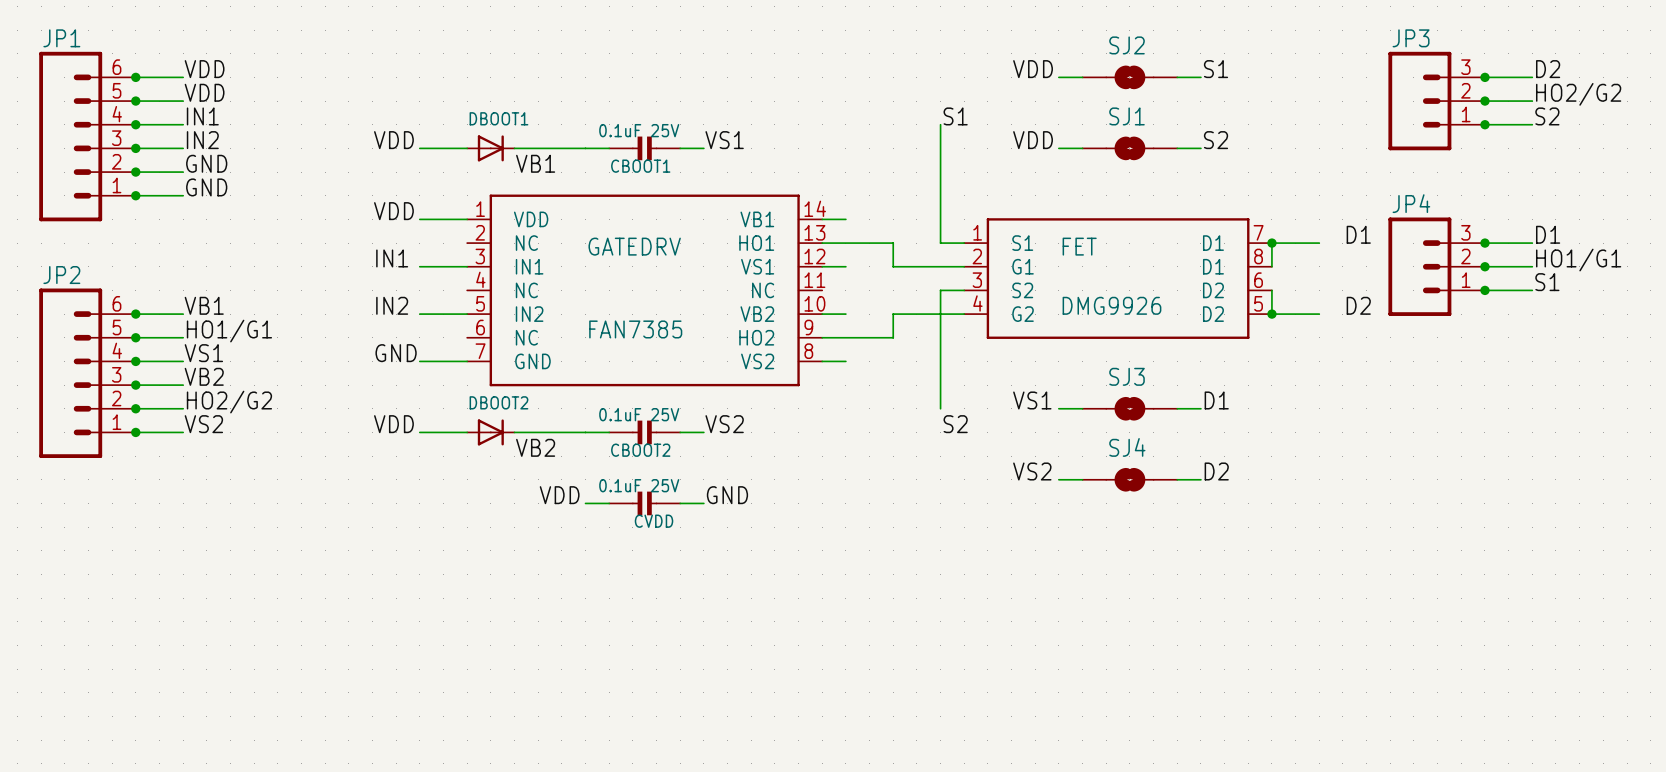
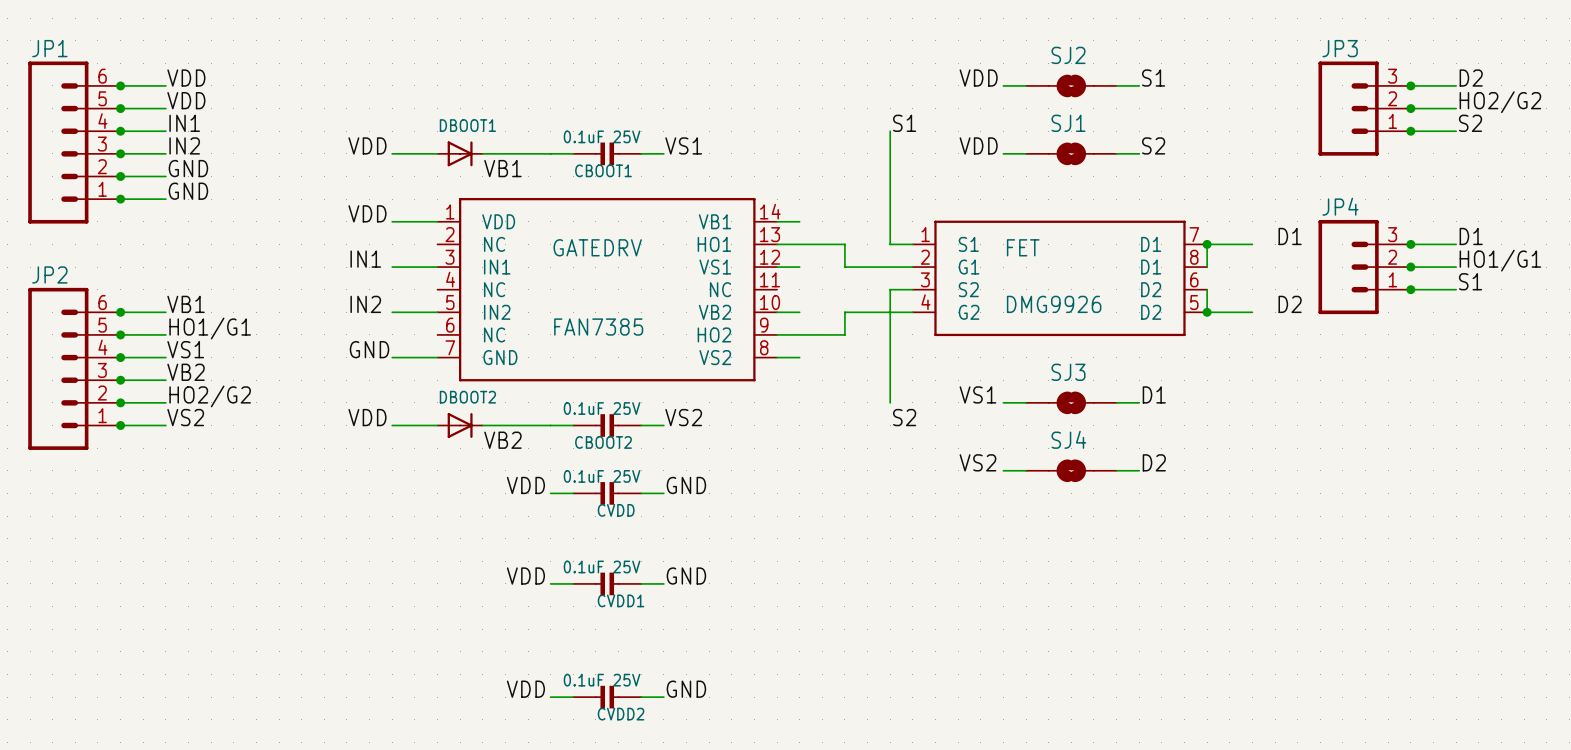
label: none -> VDD (525, 576)
label: none -> GND (686, 576)
wire: none -> (550, 583) (573, 583)
CVDD1: none -> 0.1uF 25V (607, 583)
wire: none -> (641, 583) (663, 583)
label: none -> VDD (525, 689)
label: none -> GND (686, 689)
wire: none -> (550, 697) (573, 697)
CVDD2: none -> 0.1uF 25V (607, 697)
wire: none -> (641, 697) (663, 697)

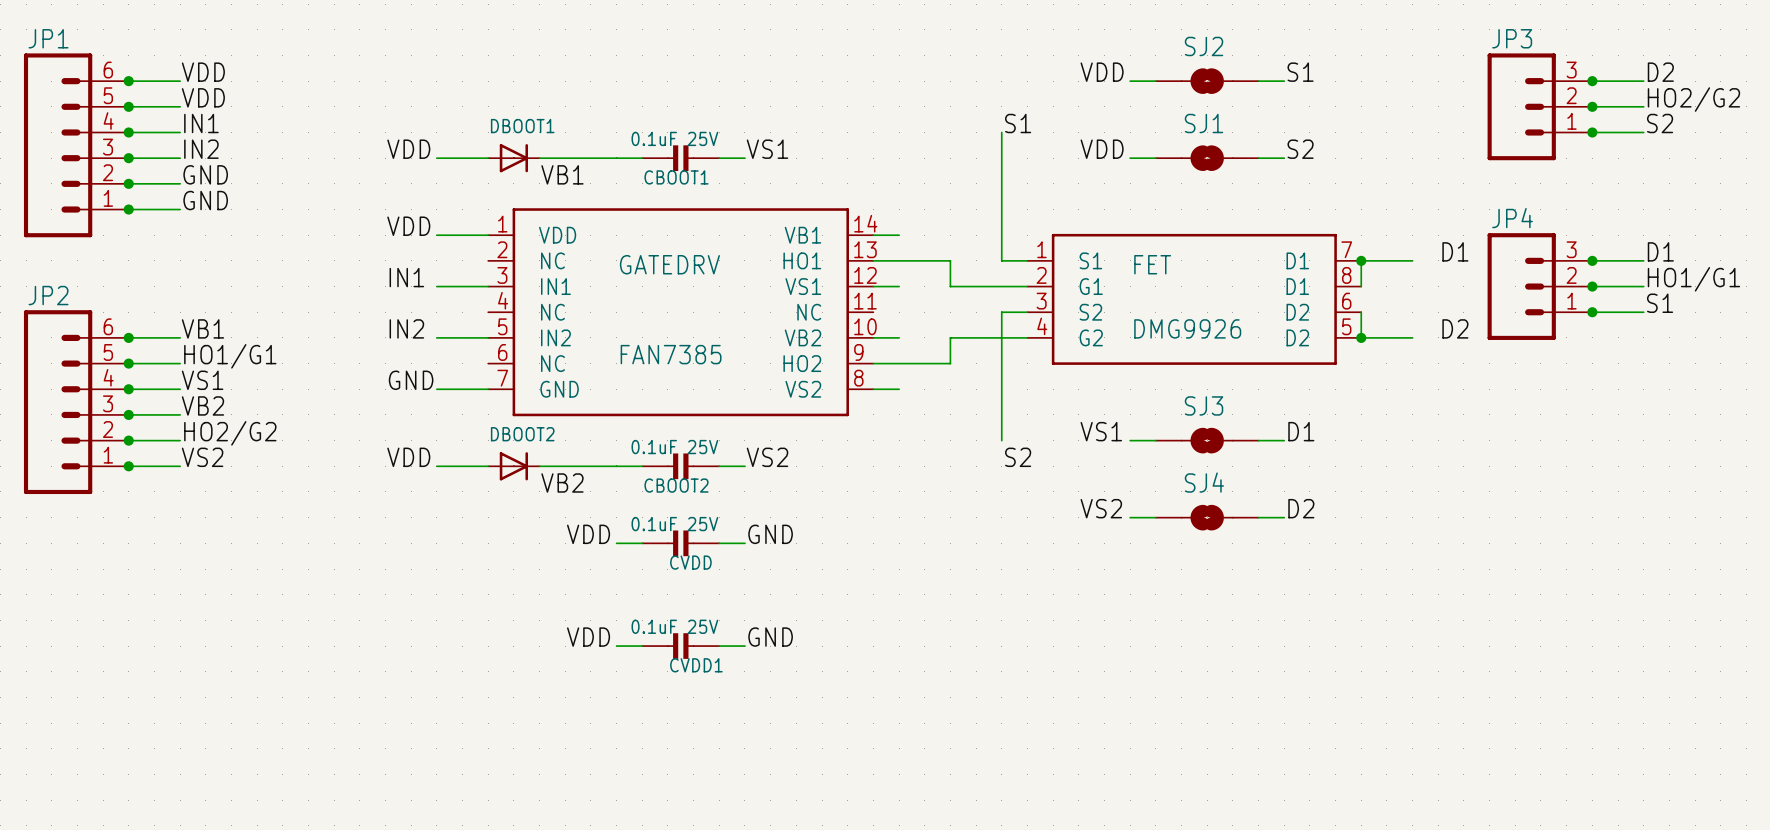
label: VDD (525, 689) -> none
label: GND (686, 689) -> none
wire: (550, 697) (573, 697) -> none
CVDD2: 0.1uF 25V (607, 697) -> none
wire: (641, 697) (663, 697) -> none

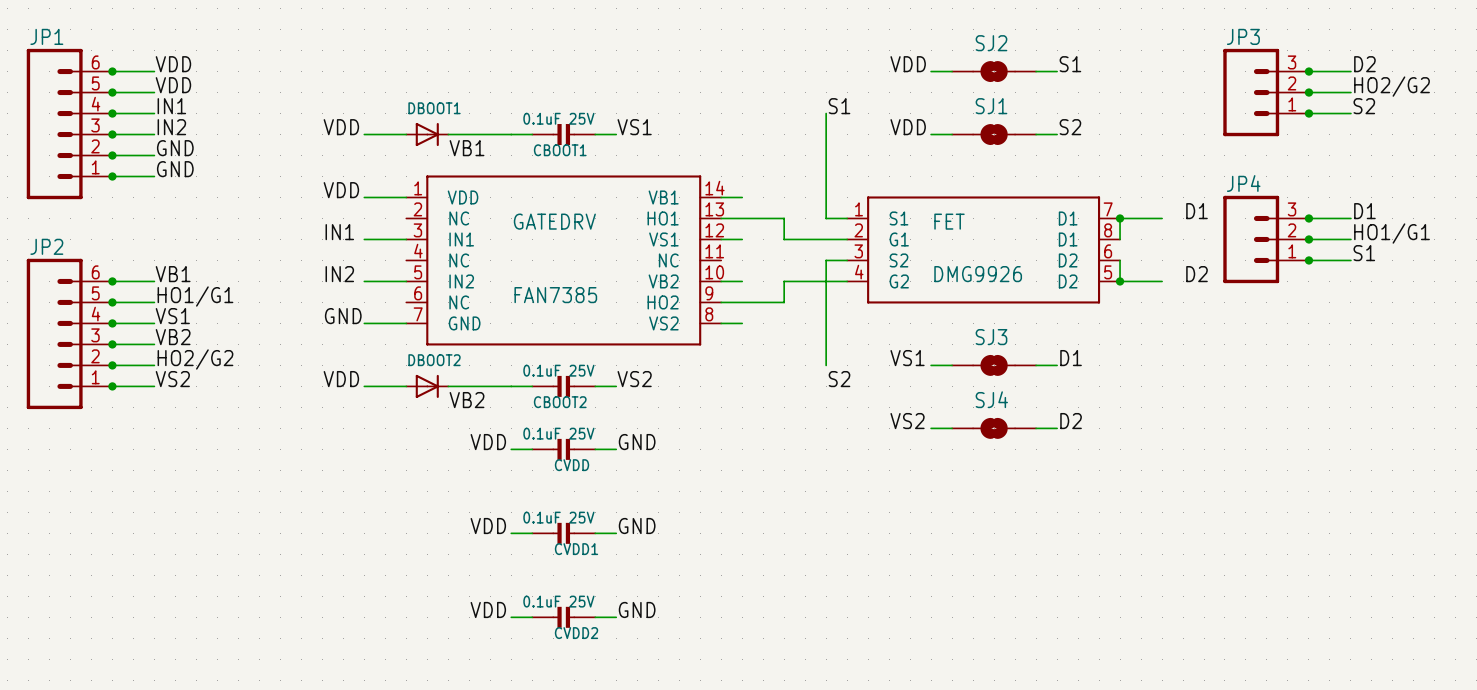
label: none -> VDD (488, 609)
label: none -> GND (637, 609)
wire: none -> (511, 617) (532, 617)
CVDD2: none -> 0.1uF 25V (563, 617)
wire: none -> (595, 617) (616, 617)

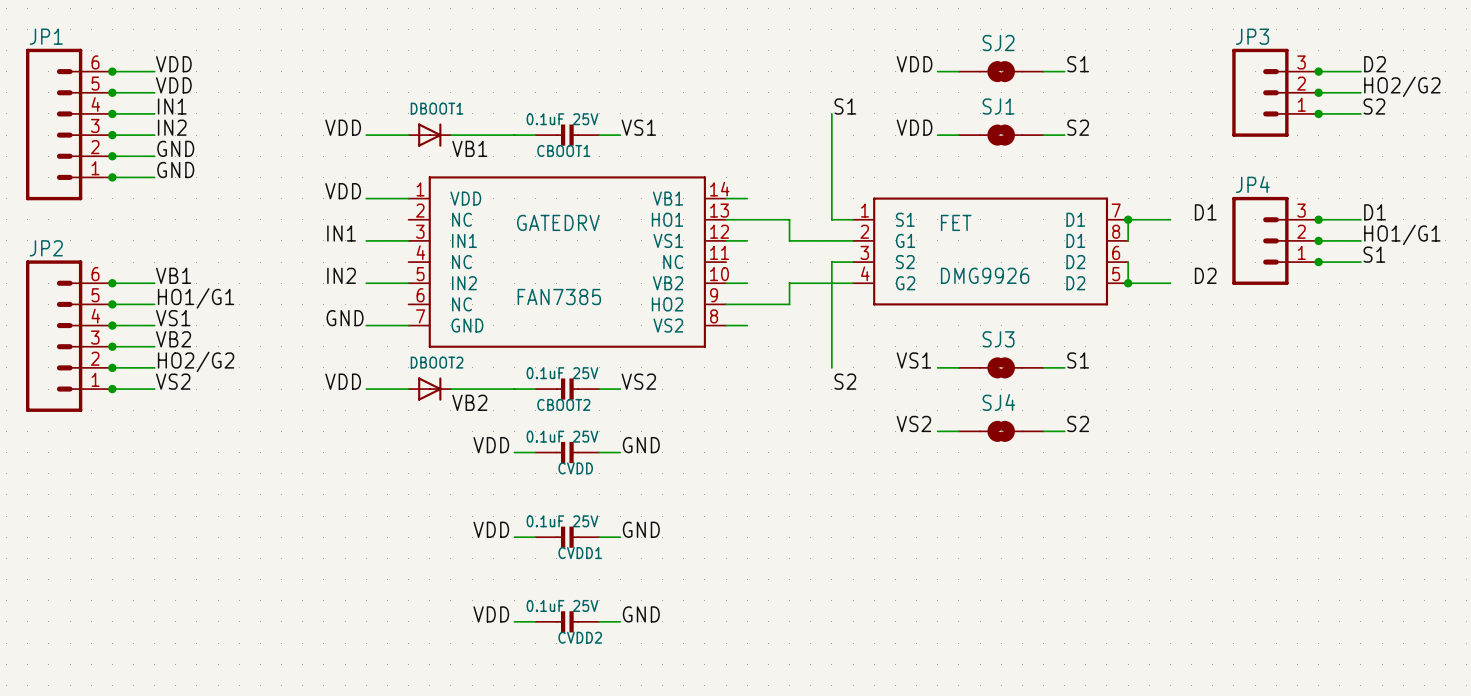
label: D1 (1071, 358) -> S1 (1078, 360)
label: D2 (1071, 421) -> S2 (1078, 423)

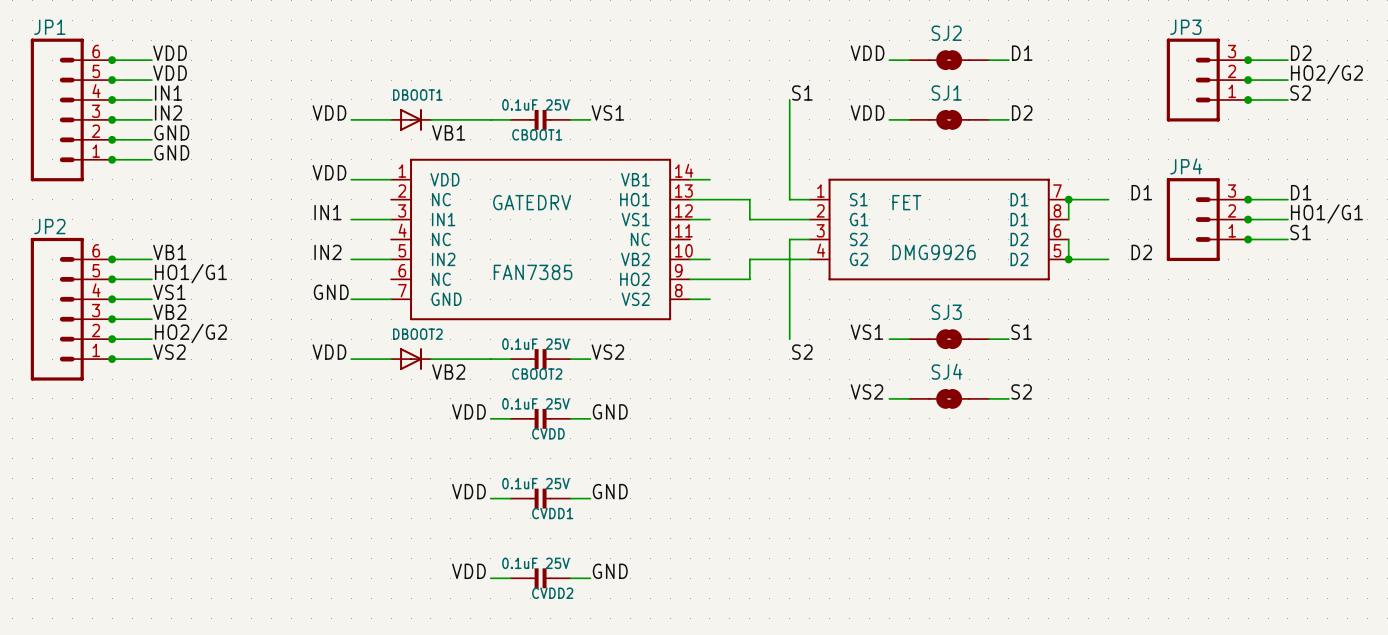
label: S1 (1078, 64) -> D1 (1022, 53)
label: S2 (1078, 127) -> D2 (1022, 112)

